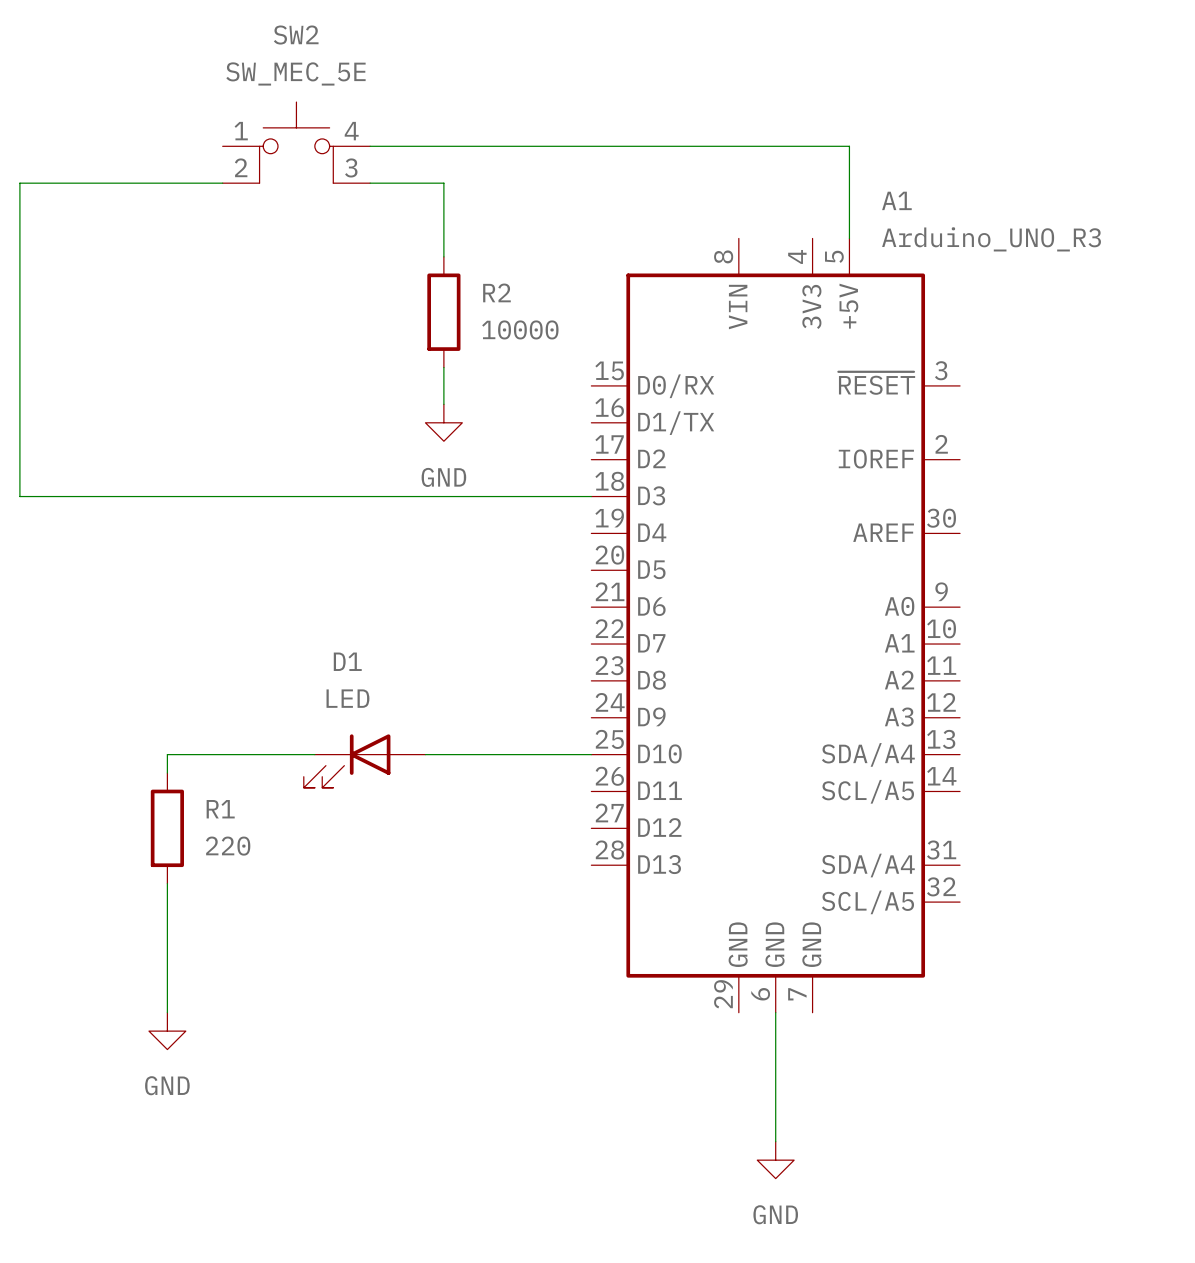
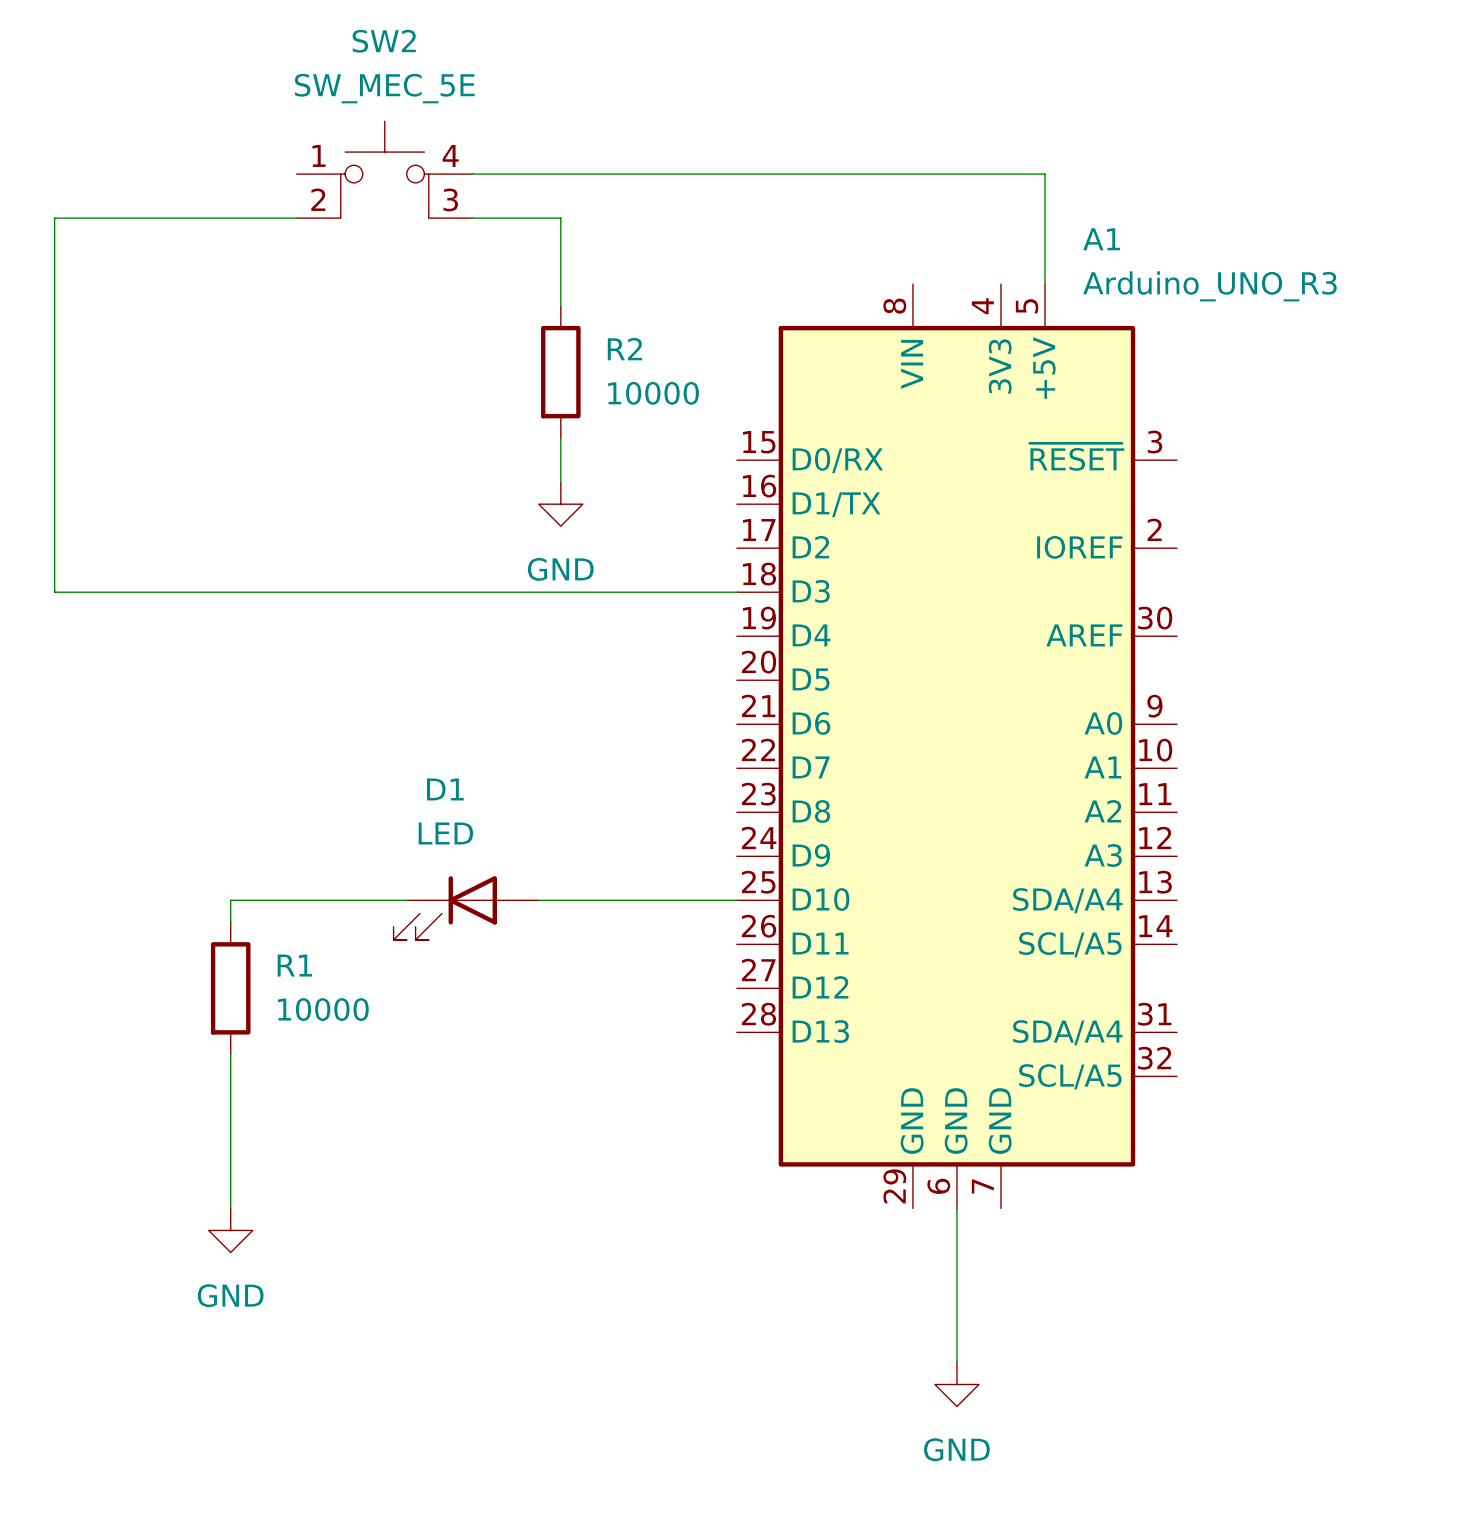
R1 value: 220 (228, 846) -> 10000 (323, 1009)

